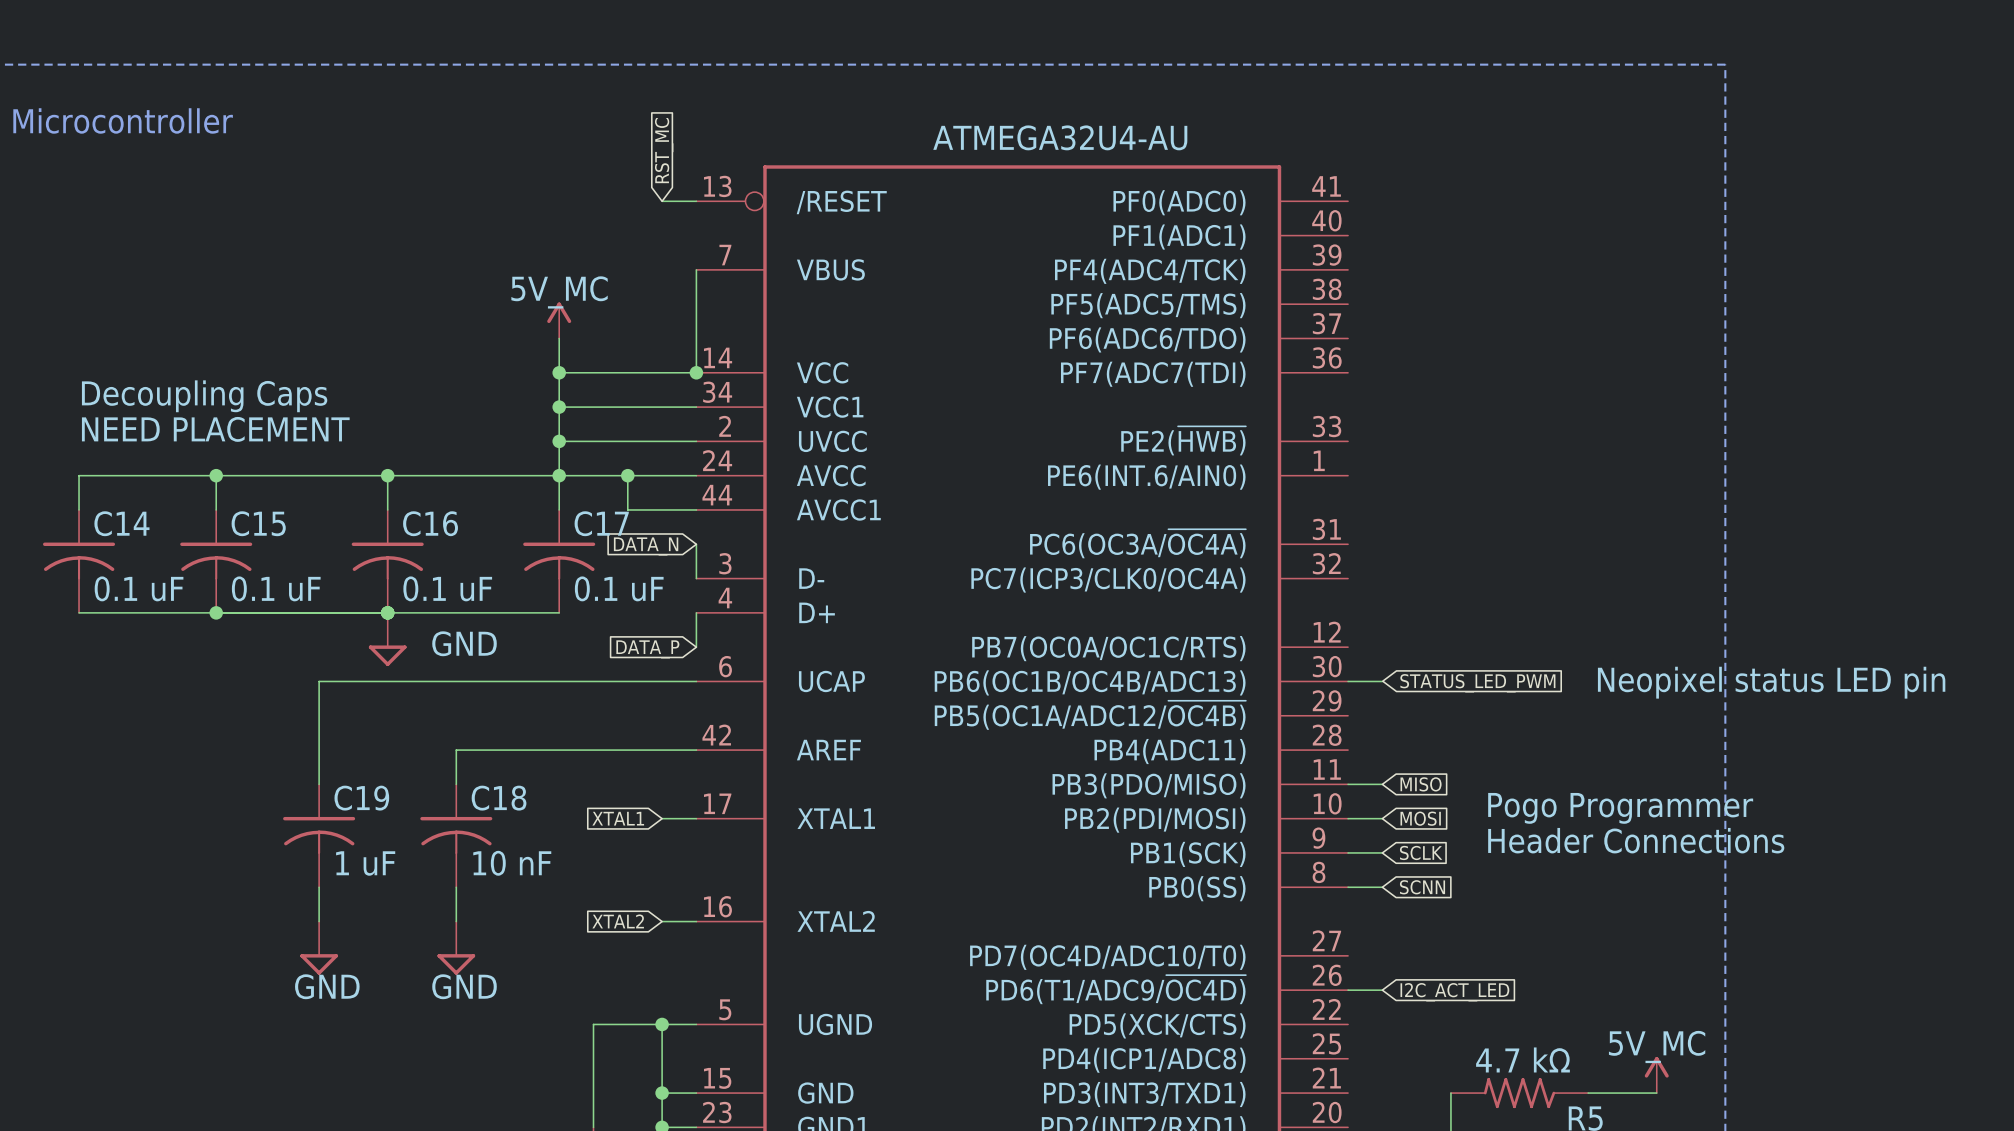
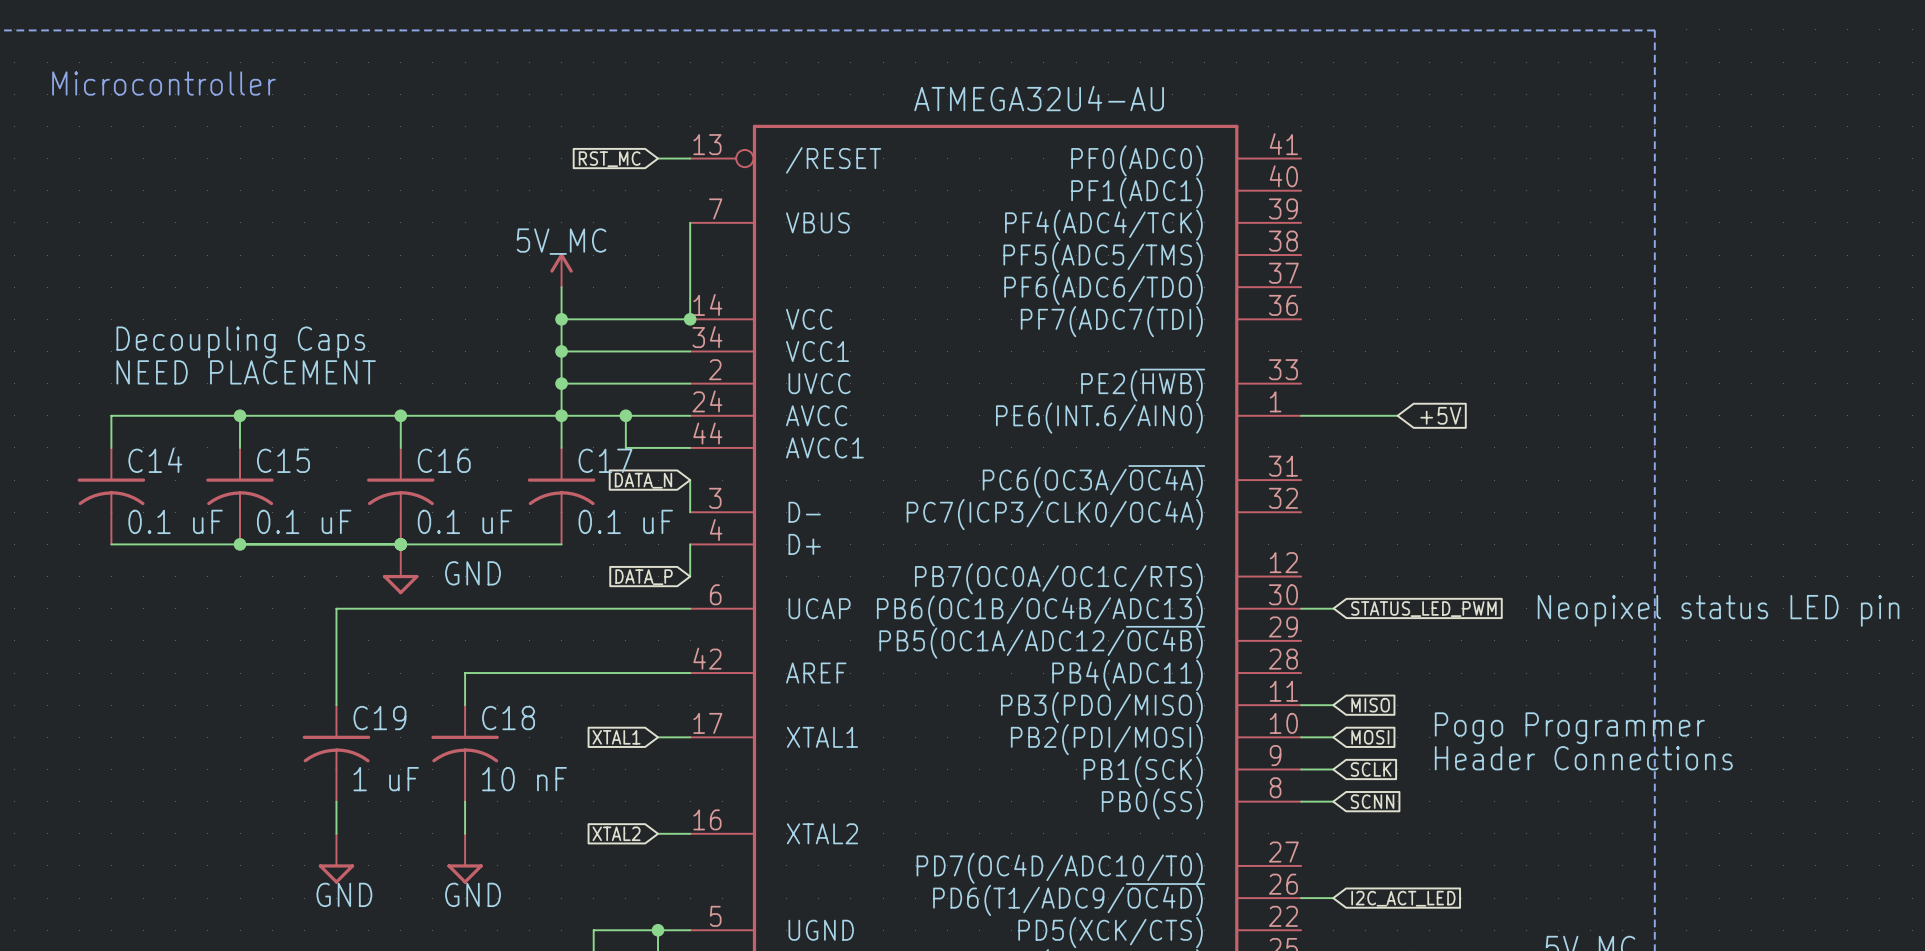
global label rotation: 0° (664, 150) -> 90° counterclockwise (609, 159)
wire: none -> (1301, 415) (1397, 415)
global label: none -> +5V (1440, 415)

